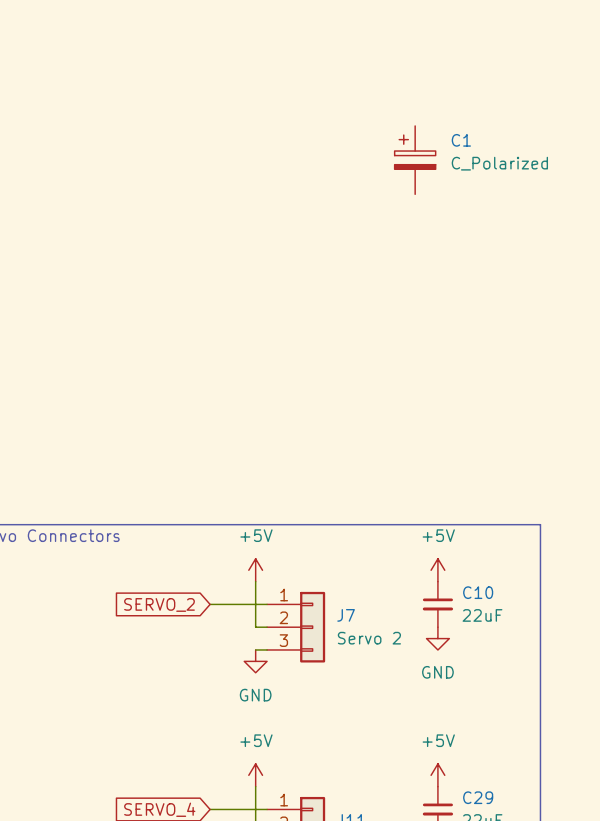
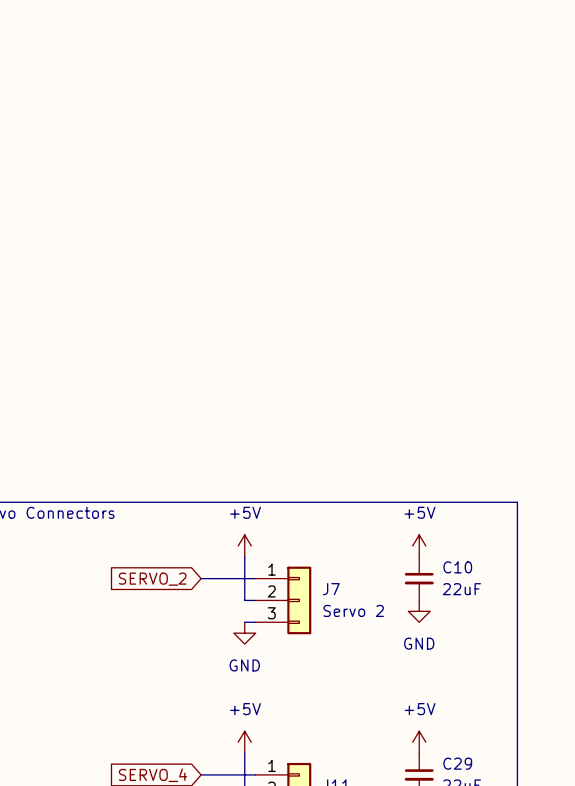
C1: C_Polarized (415, 160) -> none

